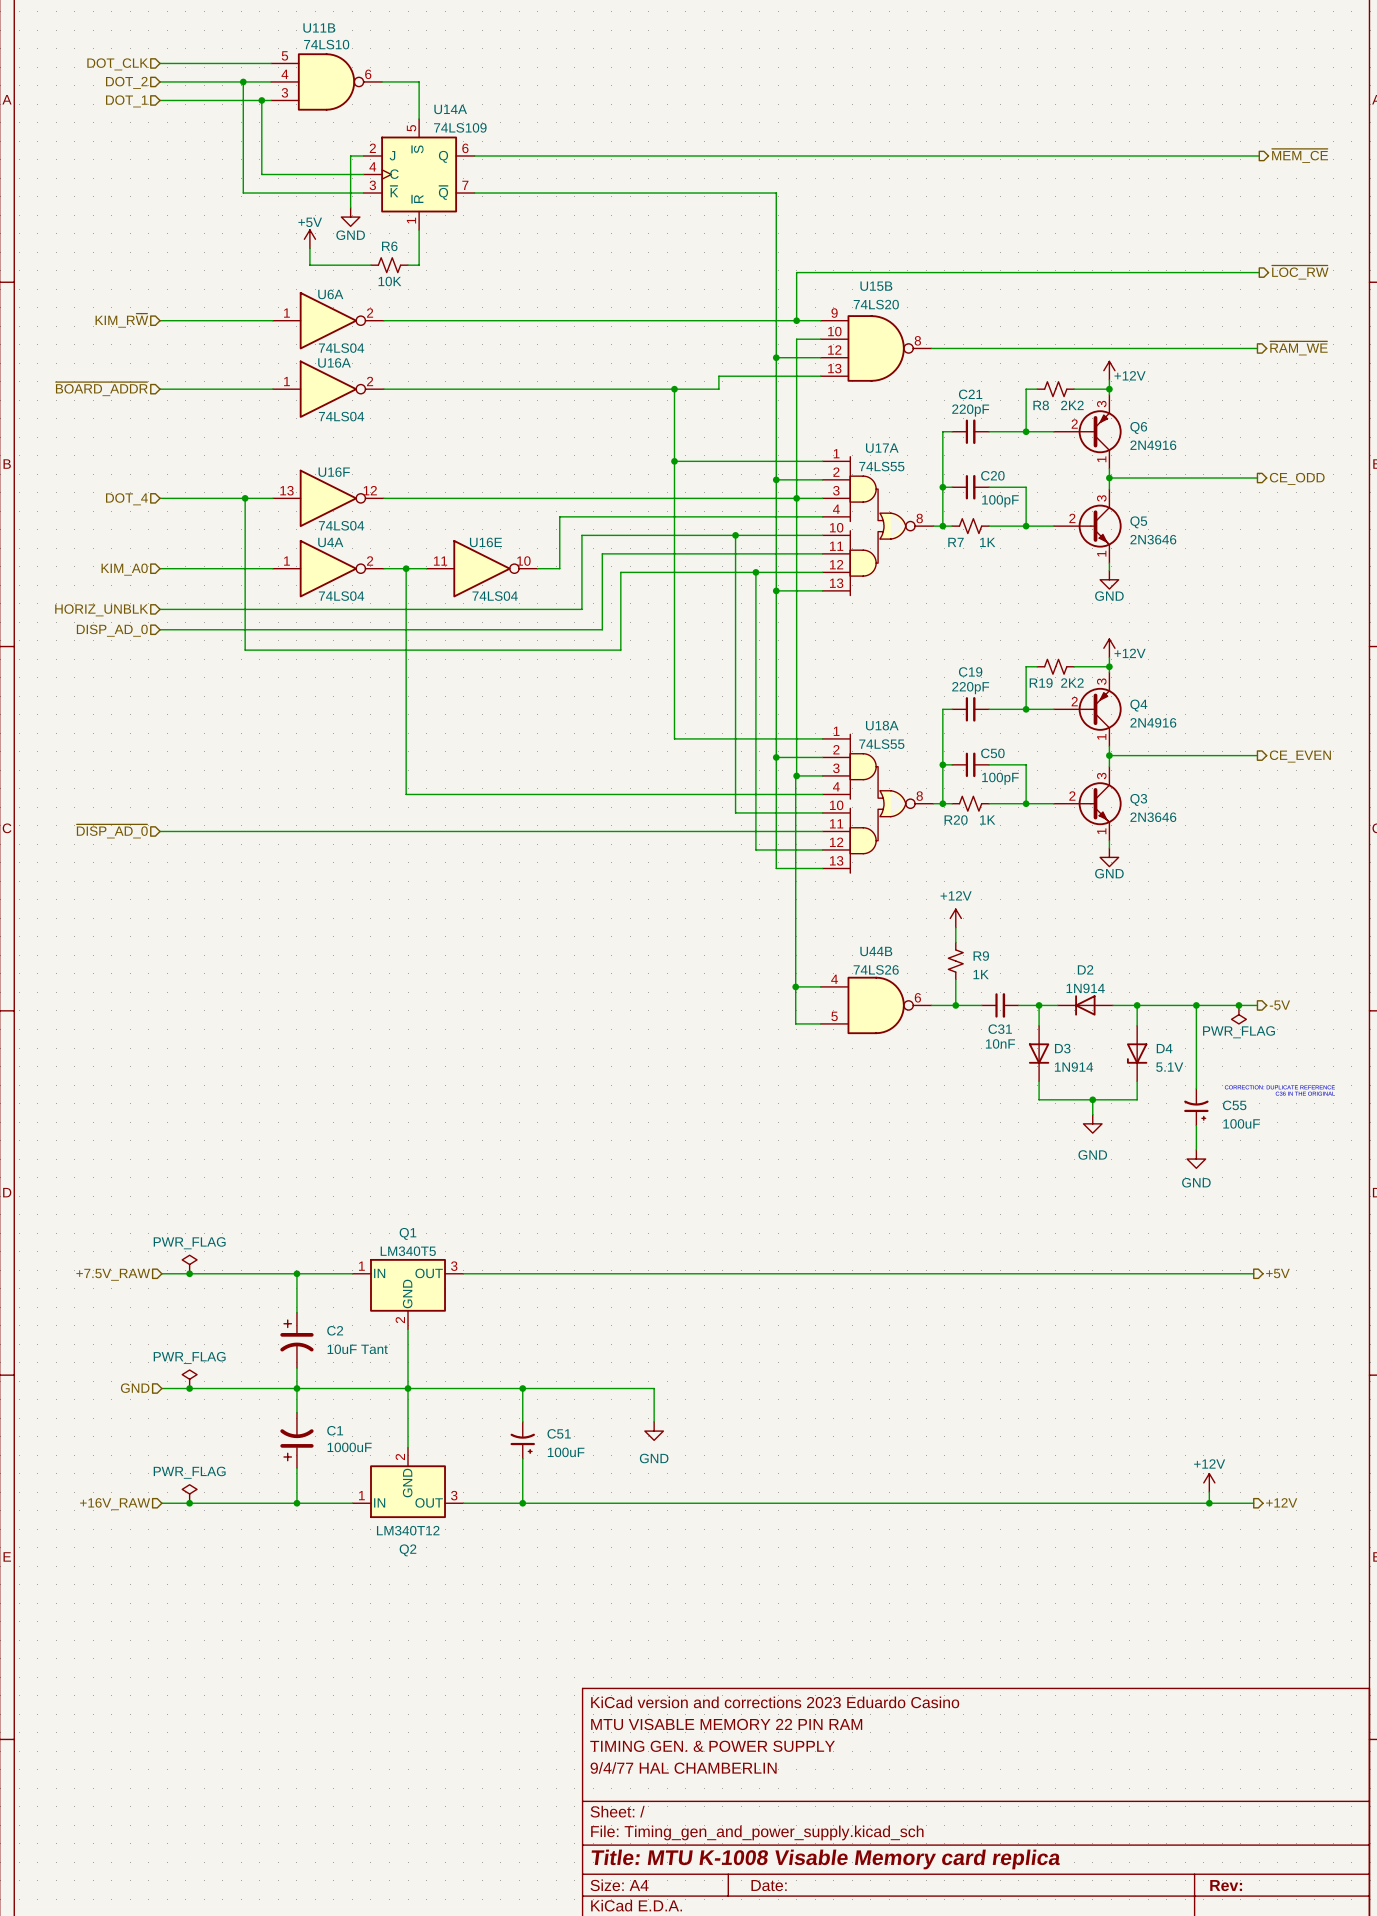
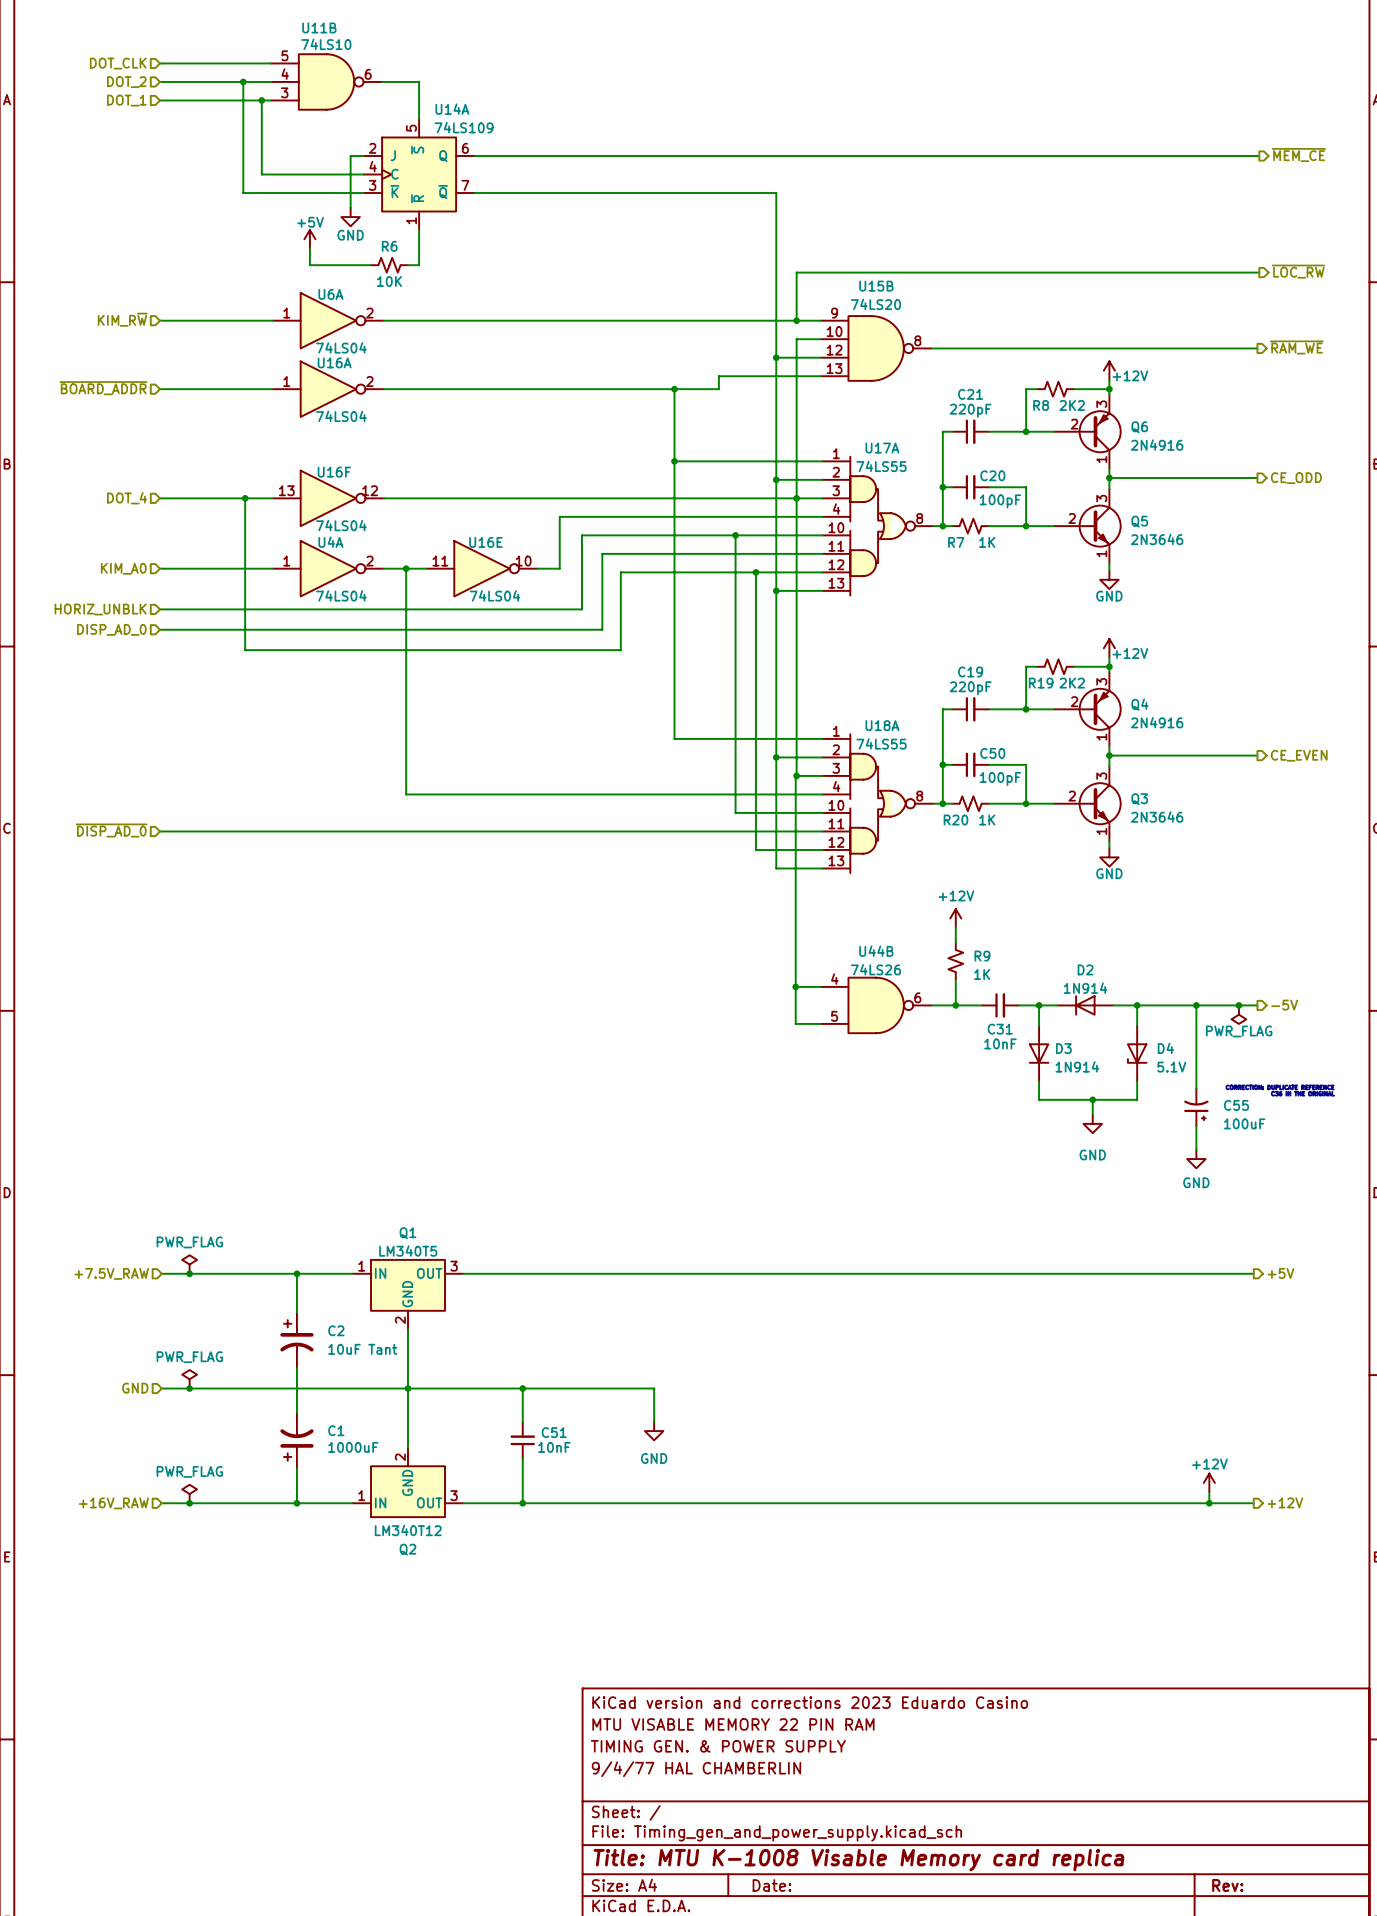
junction: (296, 1388) -> none
C51 symbol: [510, 1421, 535, 1459] -> [510, 1421, 536, 1459]
C51 value: 100uF (566, 1452) -> 10nF (554, 1447)

